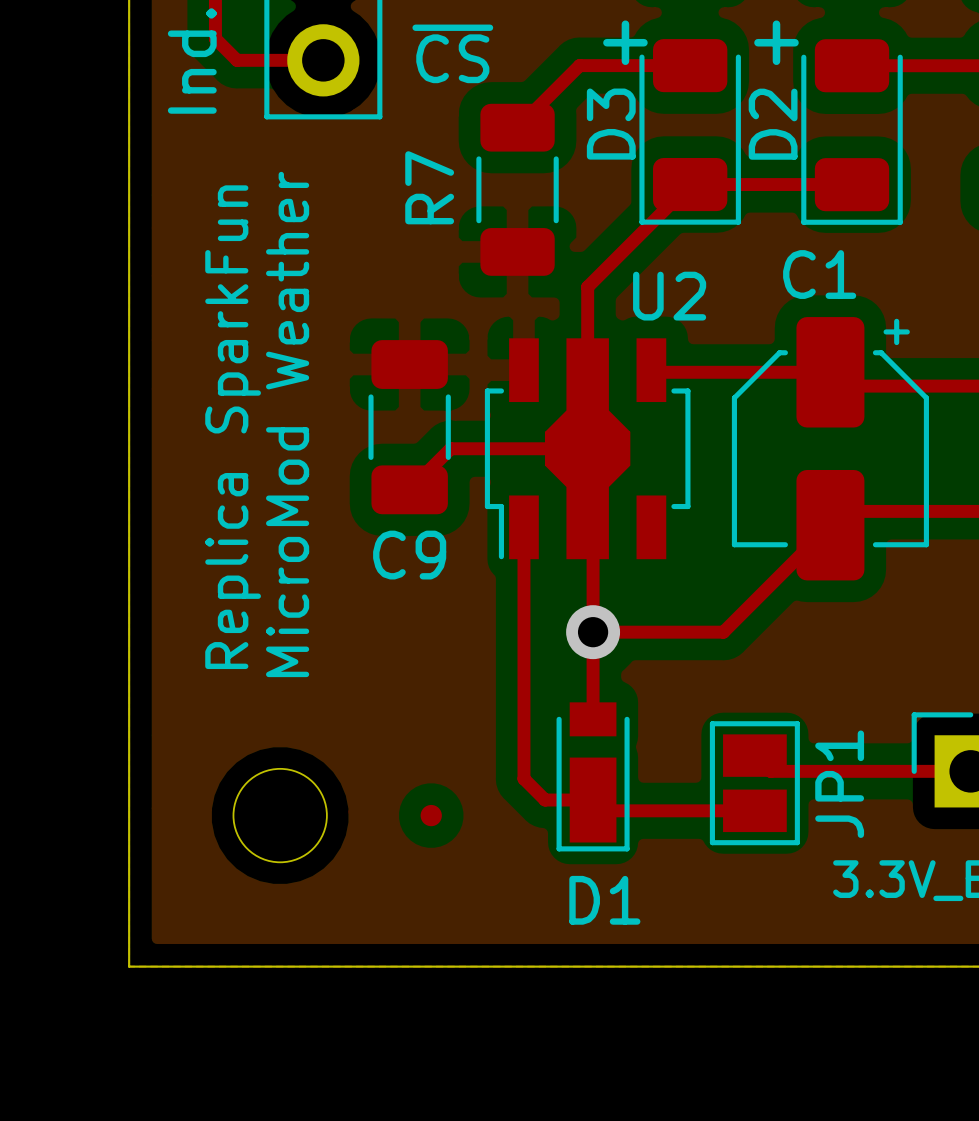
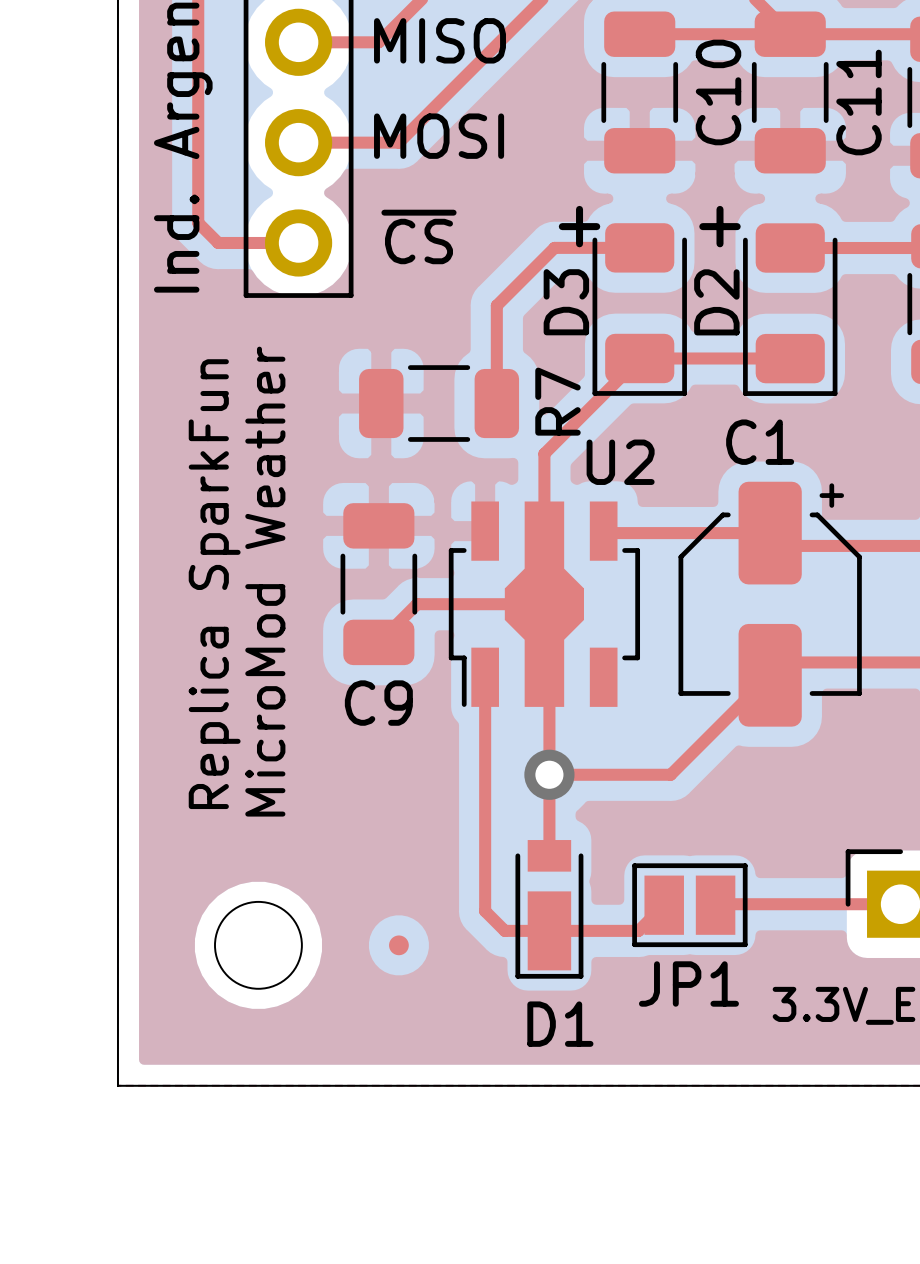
top track: (598, 65) (579, 65) (517, 127) -> (554, 247) (496, 305) (496, 403)
R7 name position: R7 (429, 187) -> R7 (557, 401)
R7 rotation: 0° (517, 189) -> 90° clockwise (439, 403)
JP1 rotation: 0° (754, 783) -> 90° clockwise (689, 905)
top track: (593, 800) (603, 810) (754, 810) -> (549, 930) (638, 930) (664, 905)

